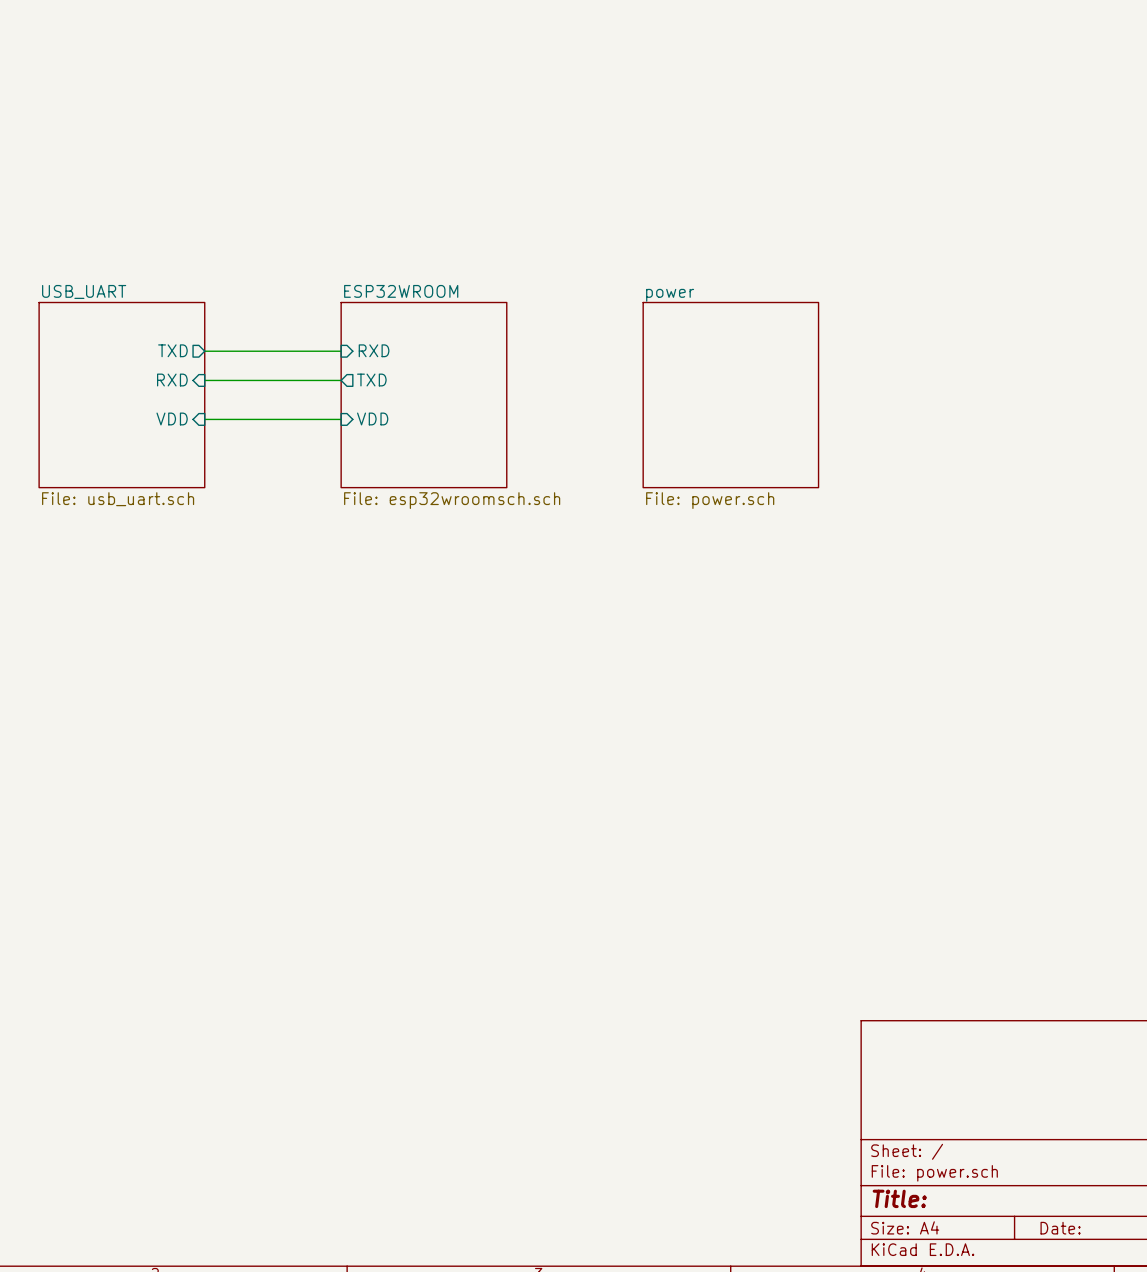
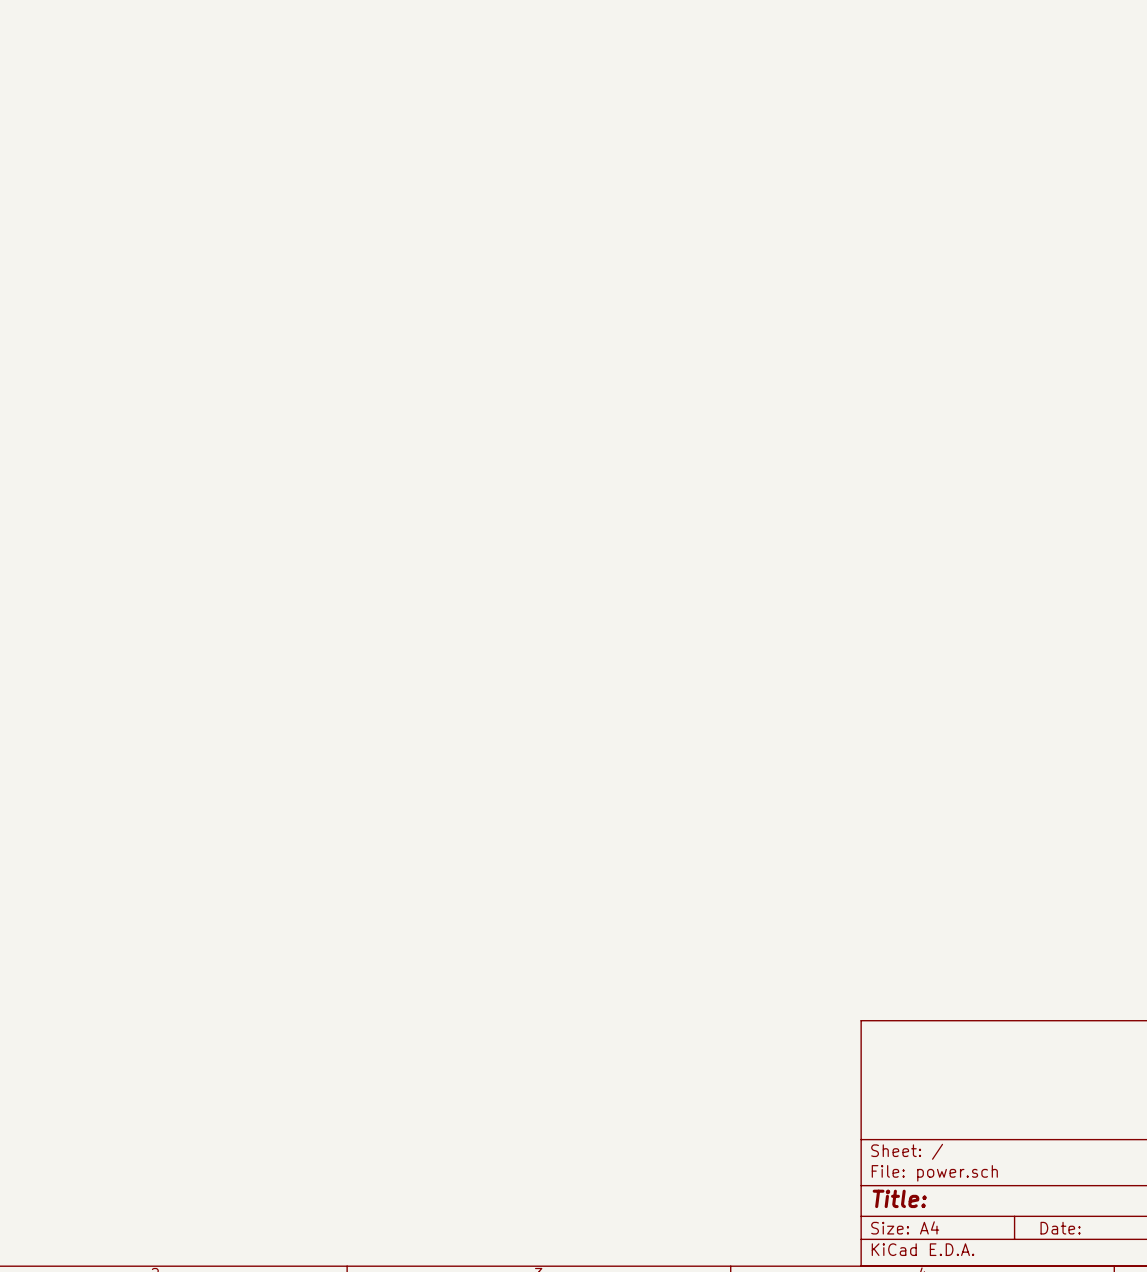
sheet pin: TXD (172, 350) -> none
sheet pin: RXD (374, 350) -> none
wire: (204, 351) (341, 351) -> none
sheet pin: RXD (172, 380) -> none
wire: (204, 380) (341, 380) -> none
sheet pin: TXD (371, 380) -> none
sheet USB_UART: File: usb_uart.sch (121, 395) -> none
sheet ESP32WROOM: File: esp32wroomsch.sch (423, 395) -> none
sheet power: File: power.sch (730, 395) -> none
sheet pin: VDD (172, 418) -> none
sheet pin: VDD (372, 418) -> none
wire: (204, 419) (341, 419) -> none

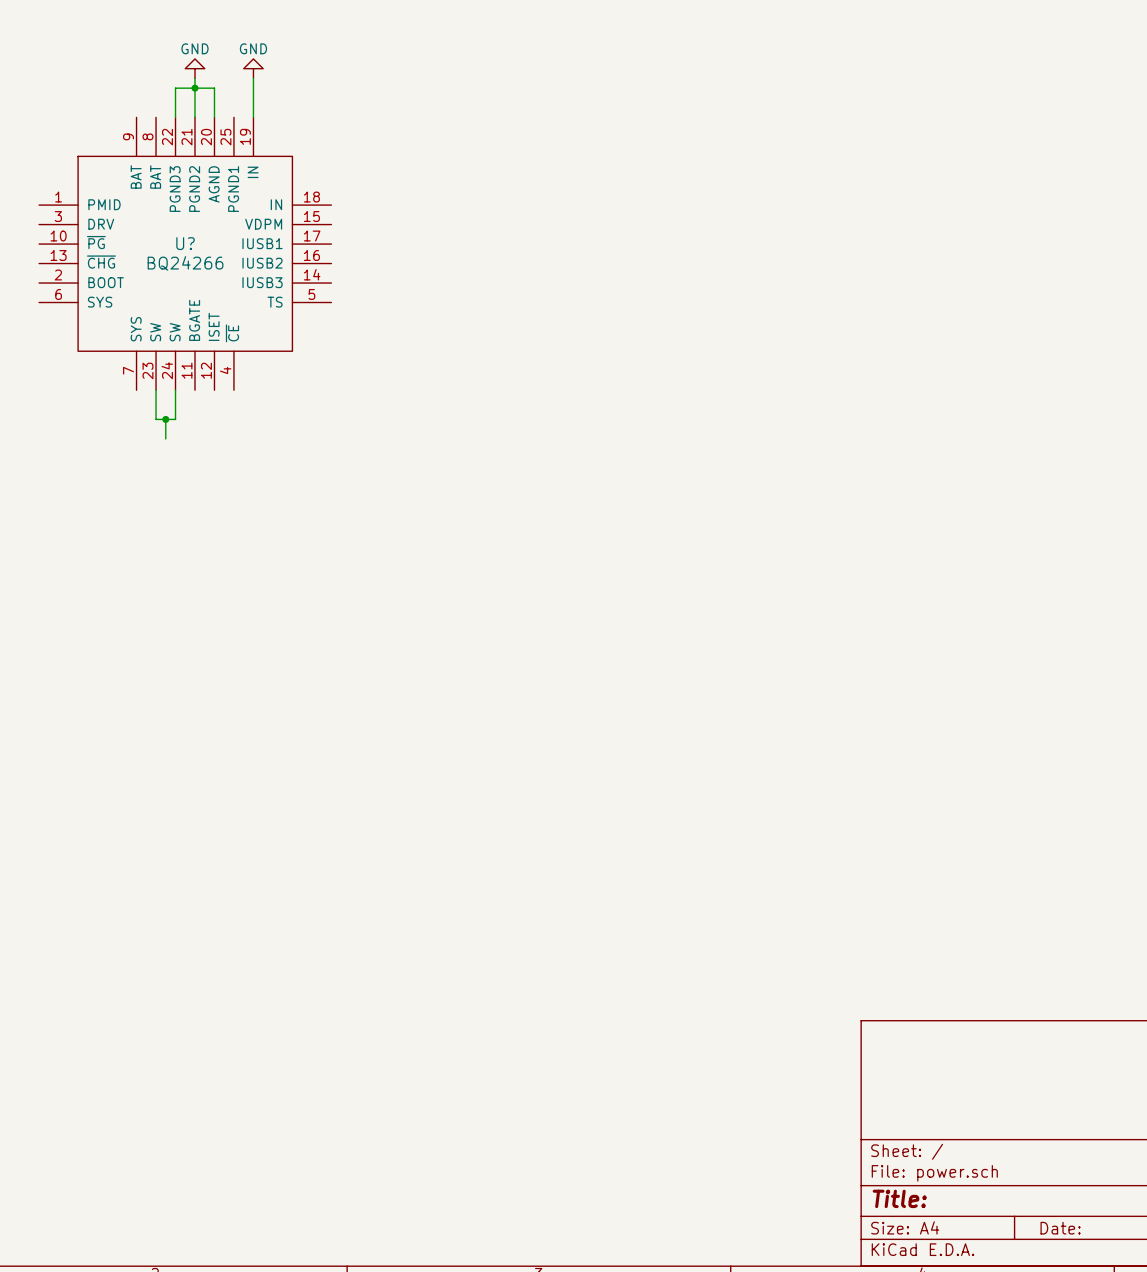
power symbol: none -> GND (194, 68)
power symbol: none -> GND (253, 68)
wire: none -> (194, 78) (194, 117)
wire: none -> (253, 78) (253, 117)
junction: none -> (194, 88)
wire: none -> (175, 117) (175, 88) (214, 88) (214, 117)
U?: none -> BQ24266 (185, 253)
wire: none -> (156, 390) (156, 419) (175, 419) (175, 390)
wire: none -> (165, 419) (165, 438)
junction: none -> (165, 419)

